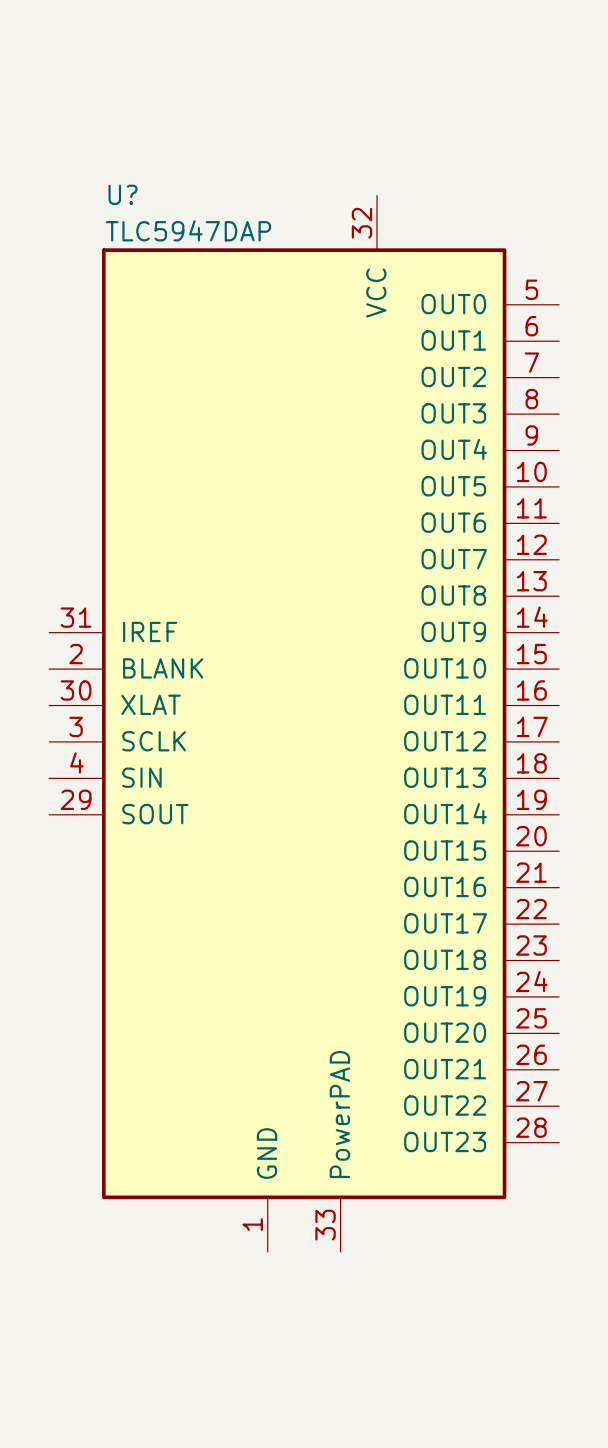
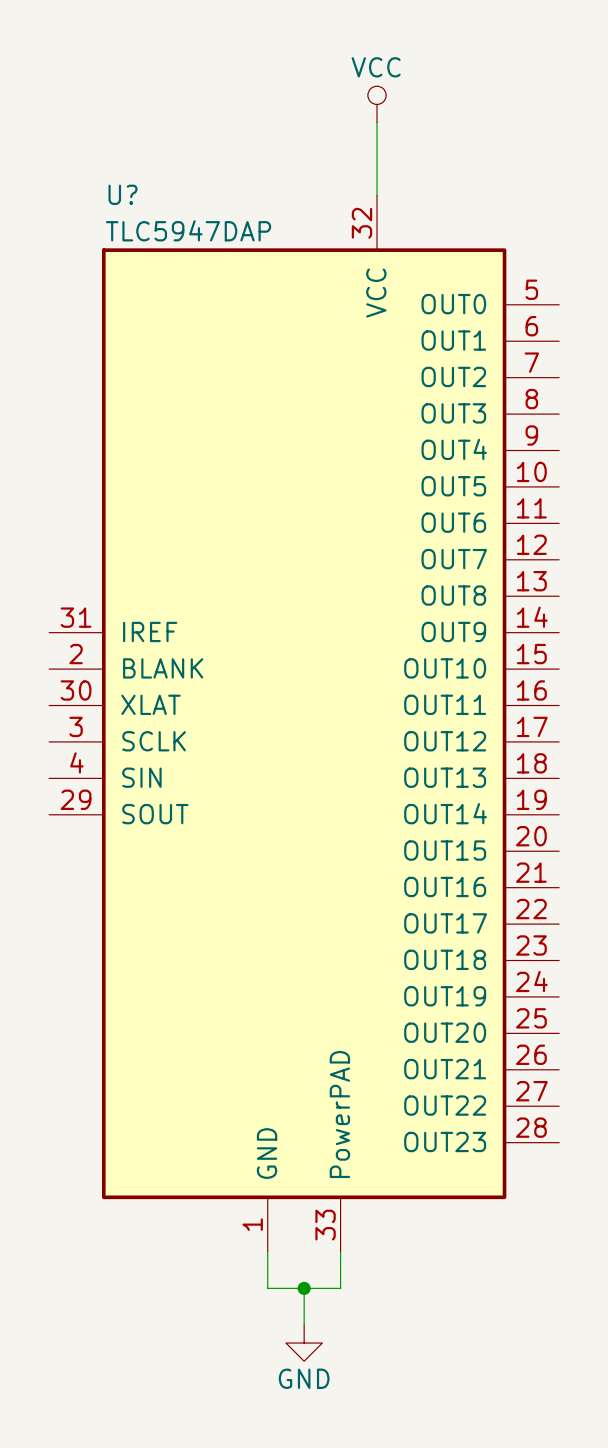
power symbol: none -> VCC (377, 104)
wire: none -> (377, 122) (377, 195)
wire: none -> (267, 1251) (267, 1288) (340, 1288) (340, 1251)
wire: none -> (304, 1288) (304, 1324)
junction: none -> (304, 1288)
power symbol: none -> GND (304, 1343)

